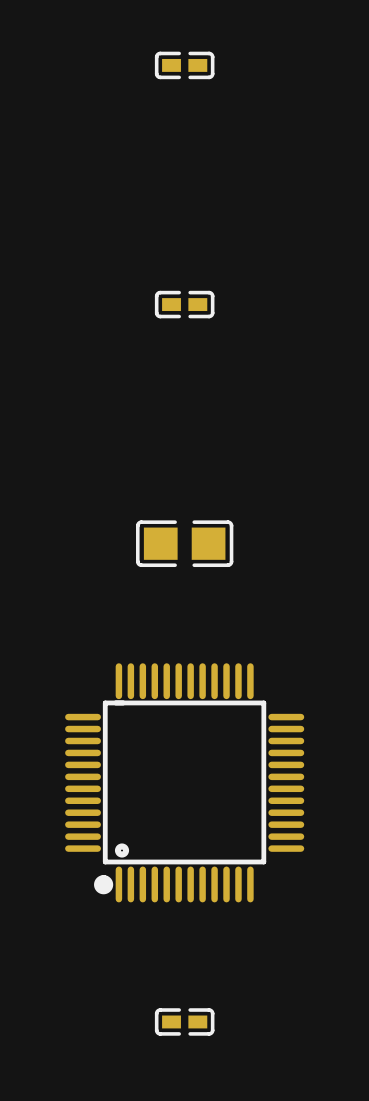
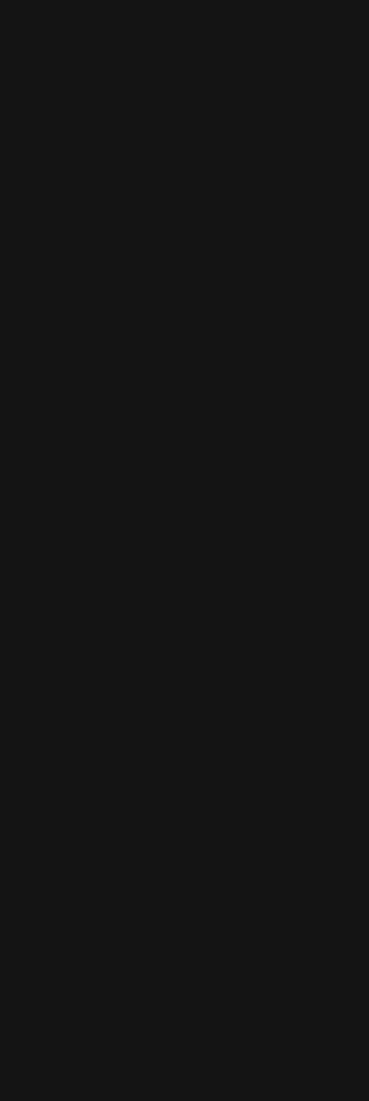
part: (184, 65) -> none
part: (184, 304) -> none
part: (184, 543) -> none
part: (184, 782) -> none
part: (184, 1021) -> none

